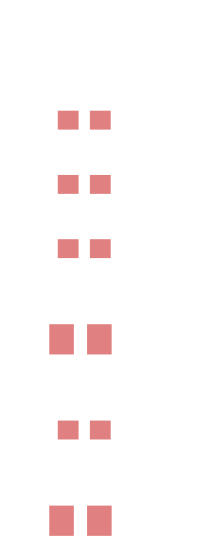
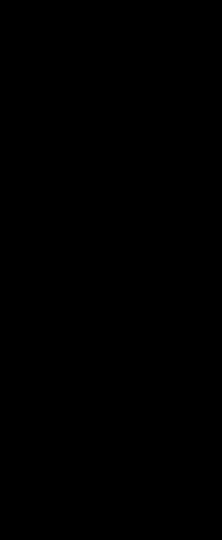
part: (84, 120) -> none
part: (84, 184) -> none
part: (84, 248) -> none
part: (80, 339) -> none
part: (84, 430) -> none
part: (80, 520) -> none

